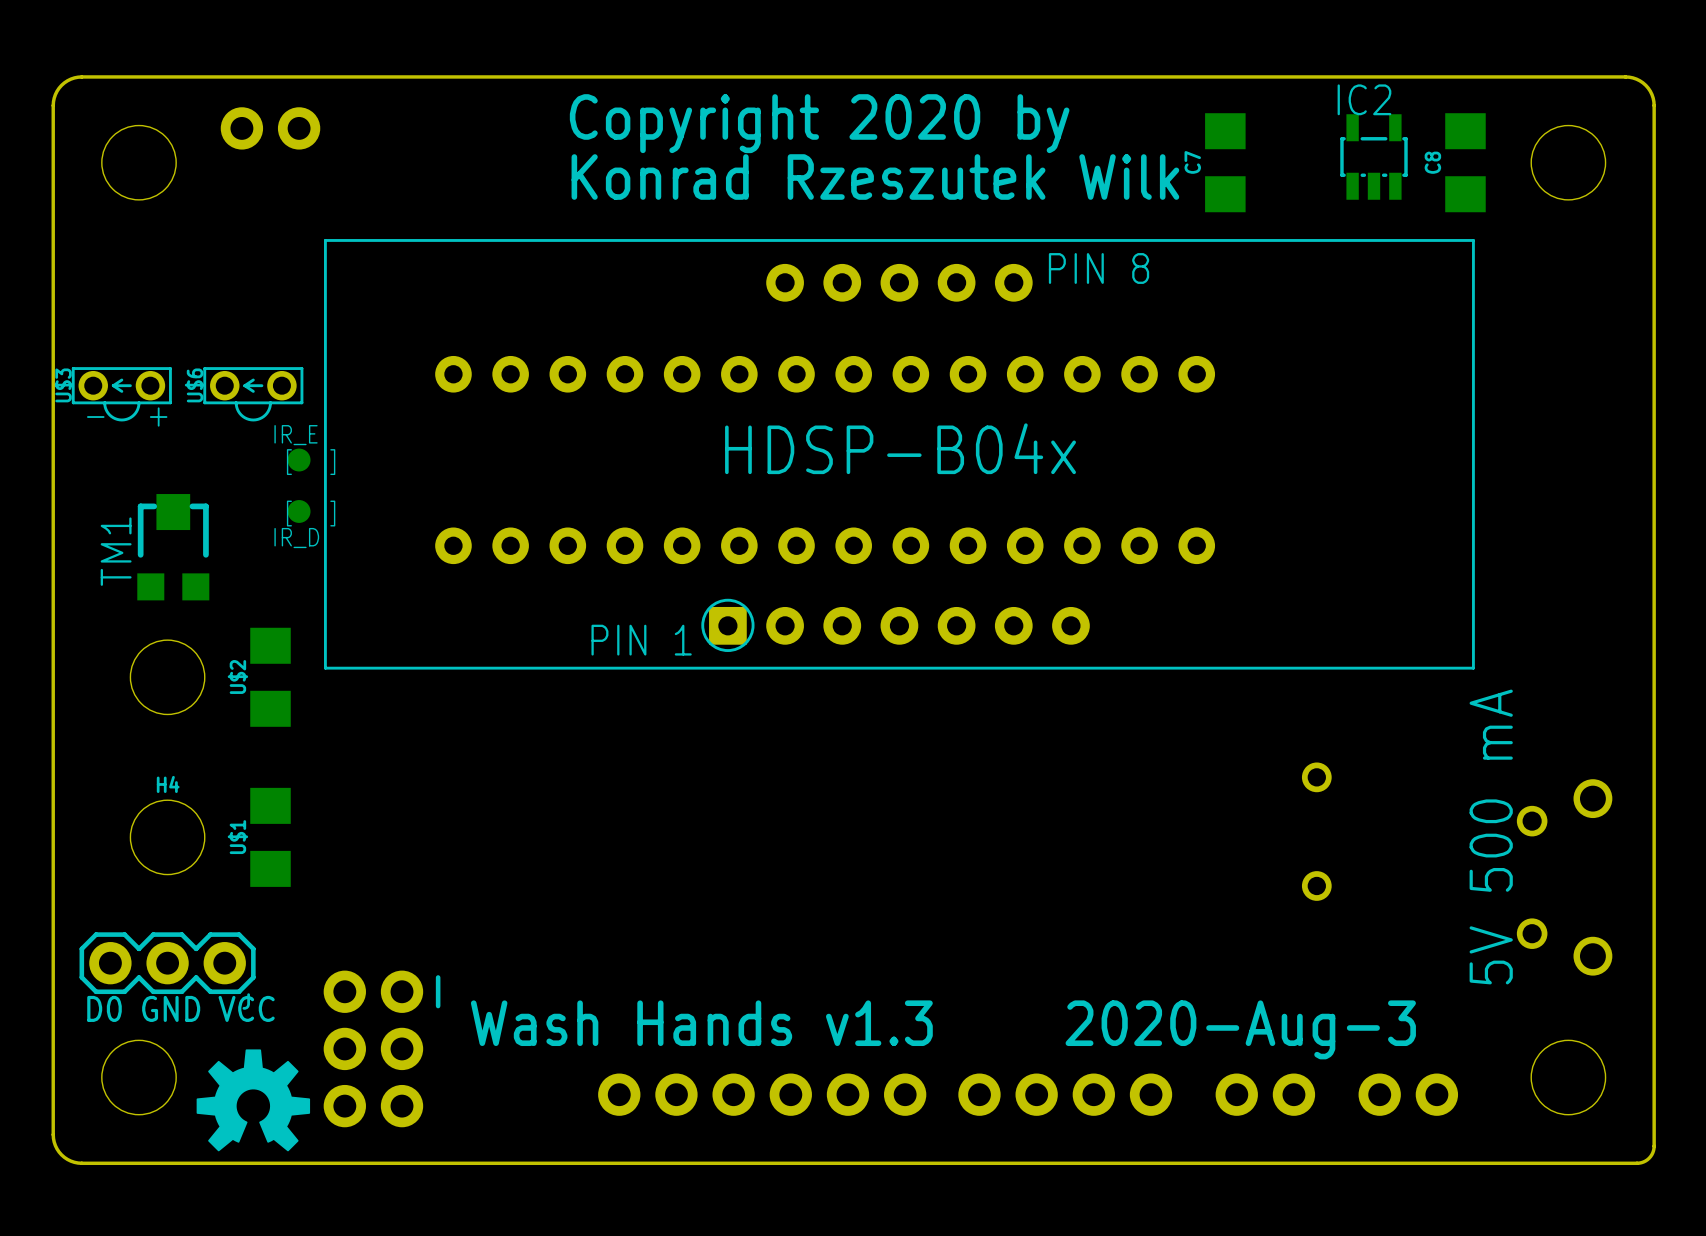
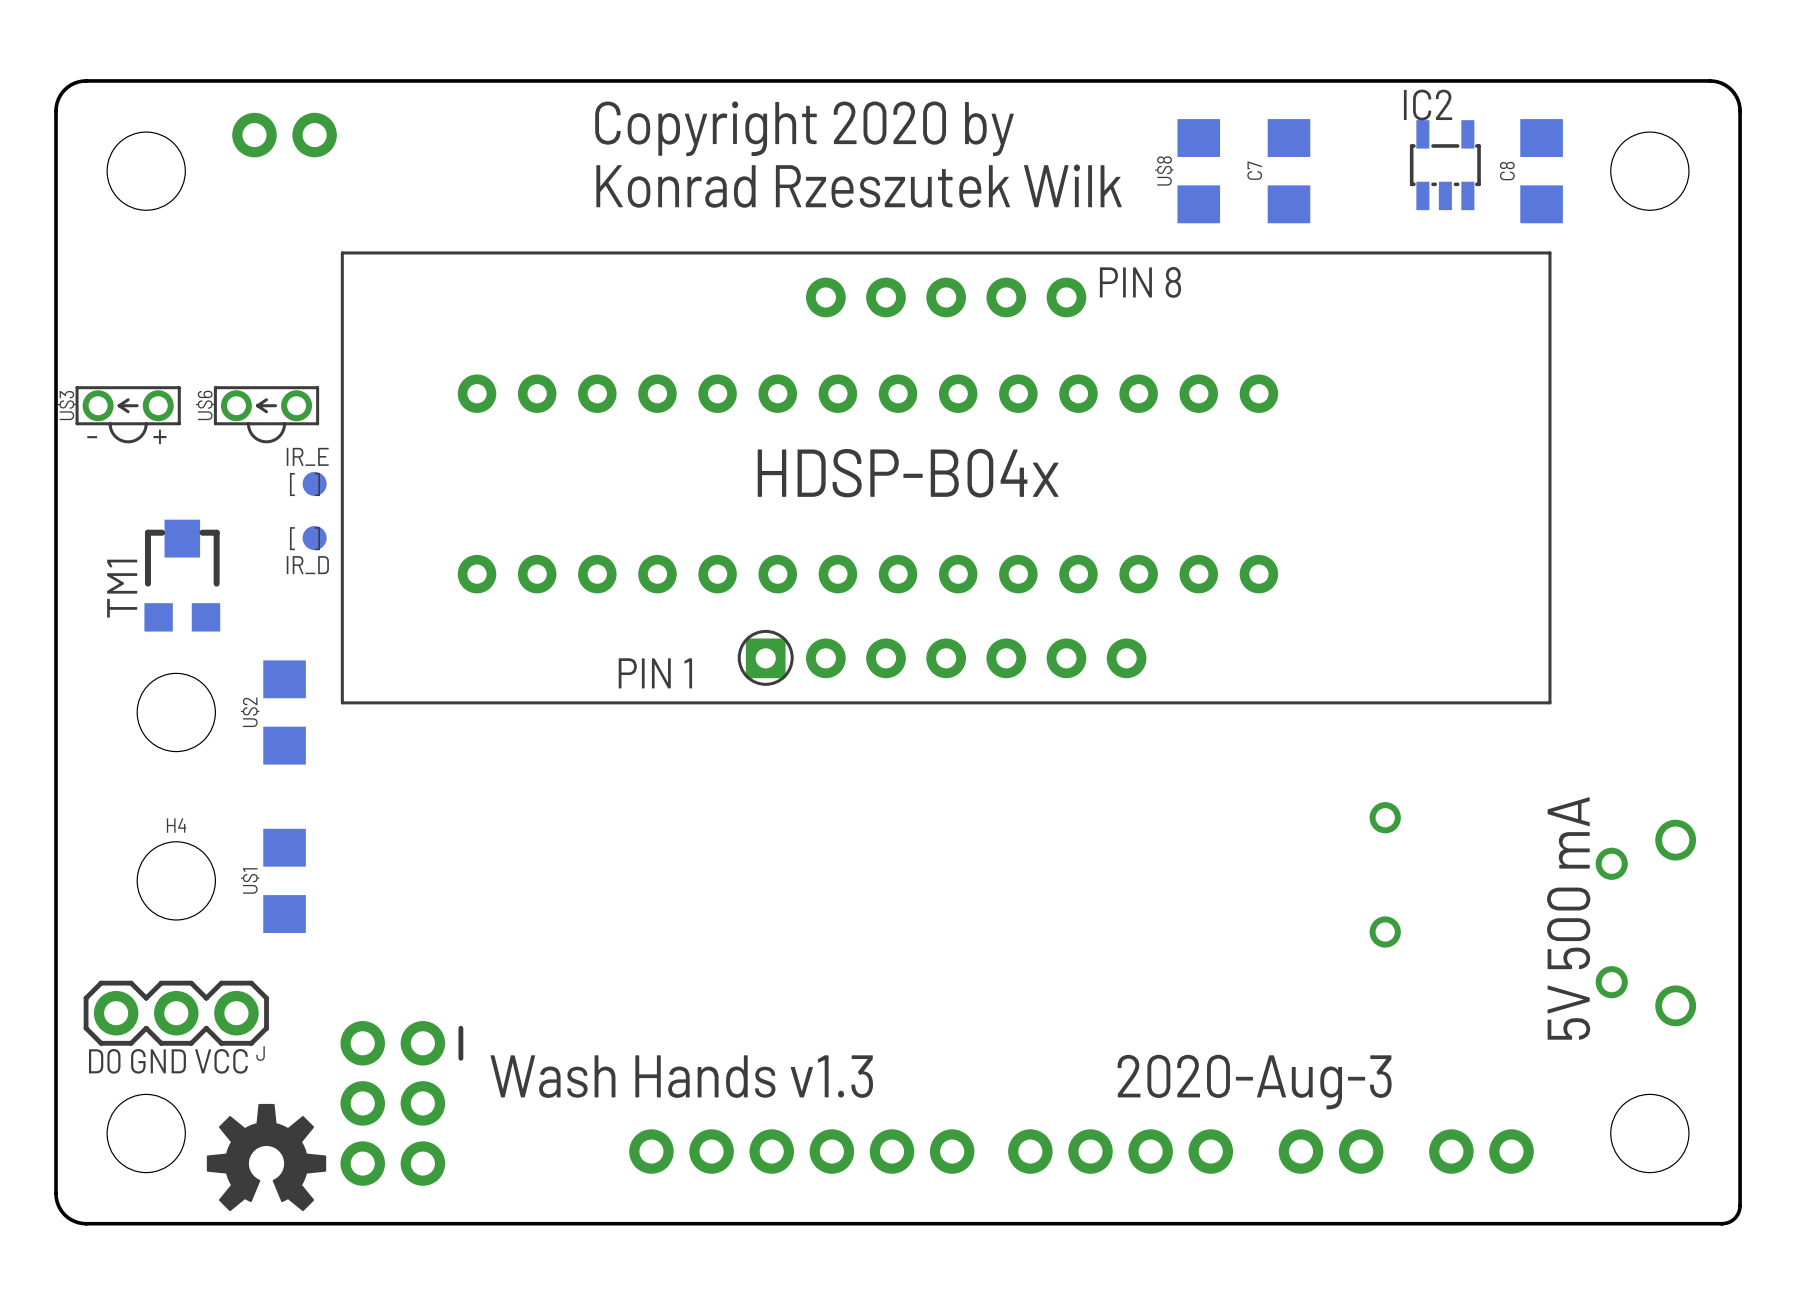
U$8: none -> (1198, 171)

